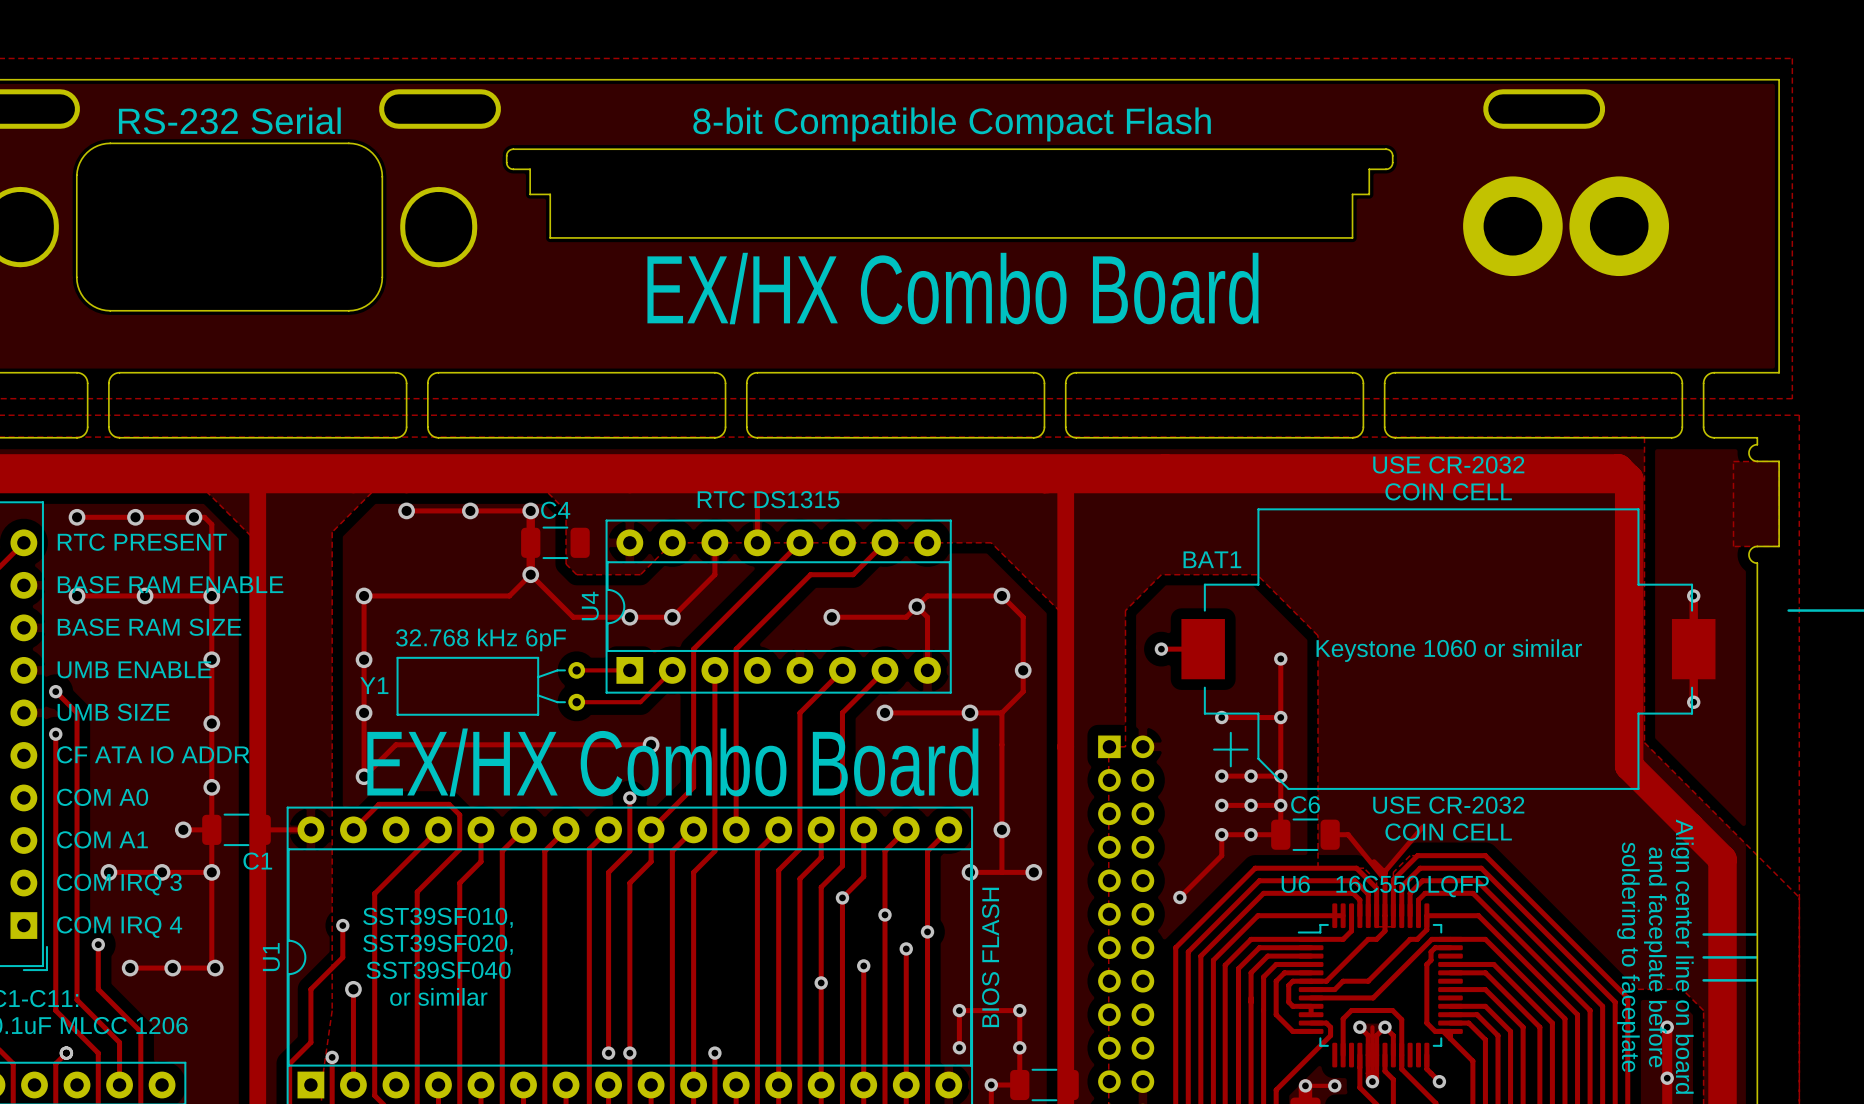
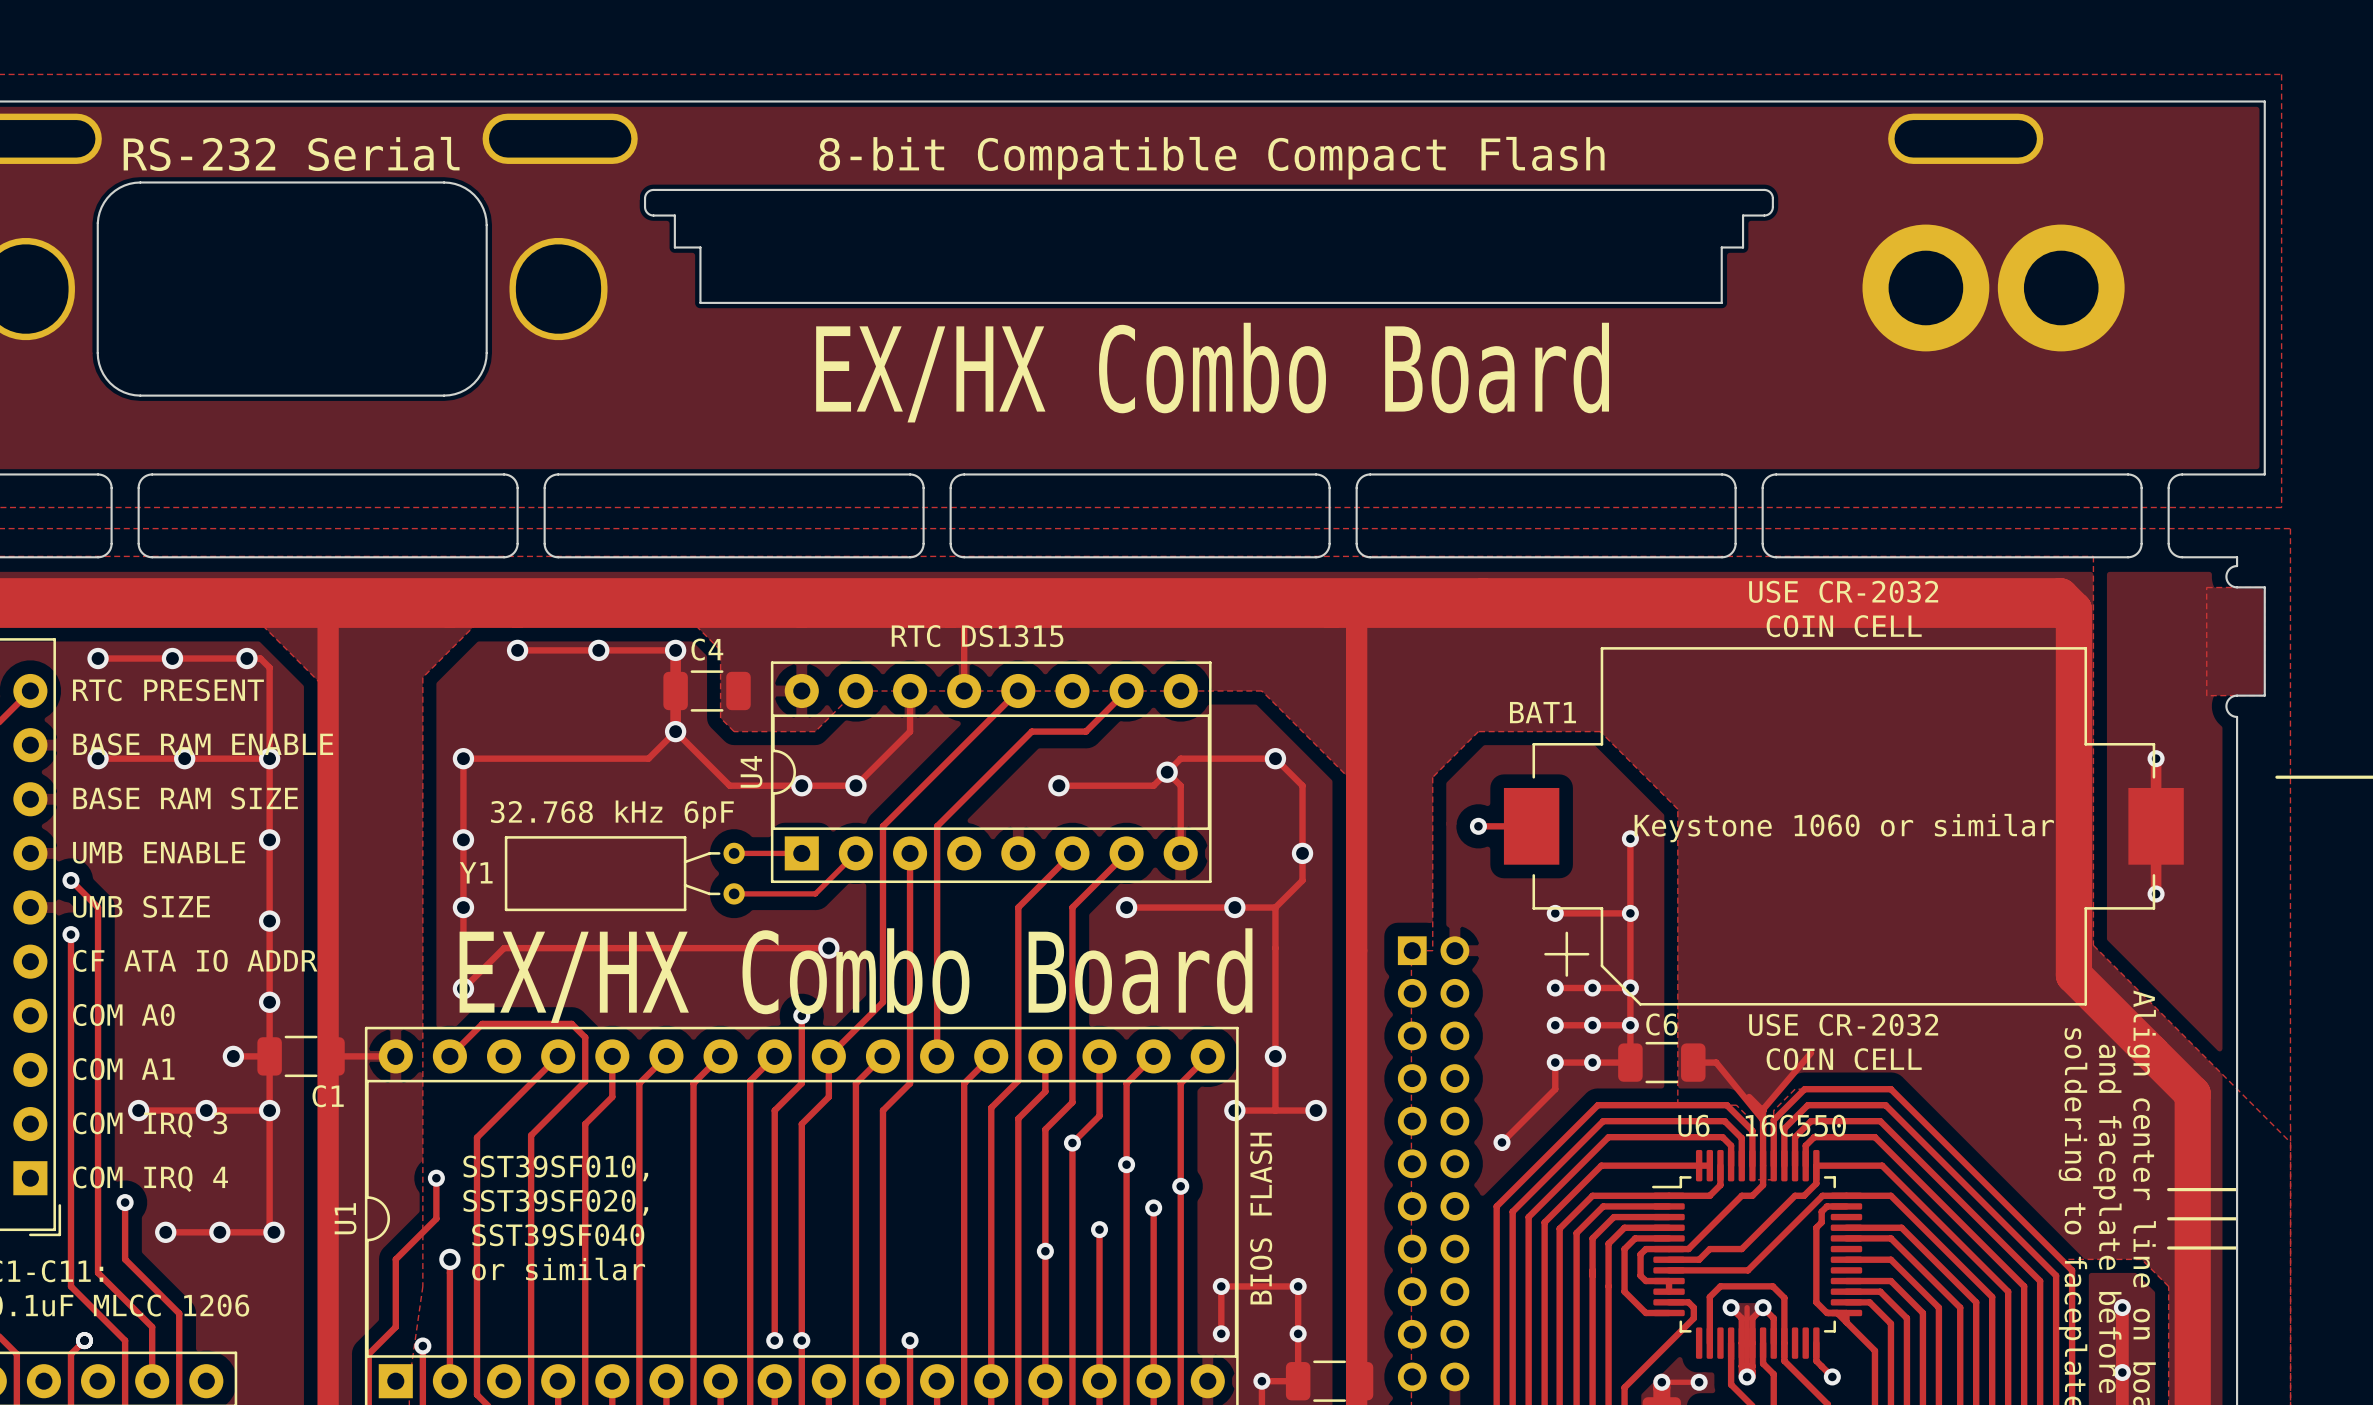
U6 name position: U6 (1295, 884) -> U6 (1693, 1125)
U6 value: none -> 16C550 (1795, 1125)
U6 text: 16C550 LQFP (1412, 886) -> none

